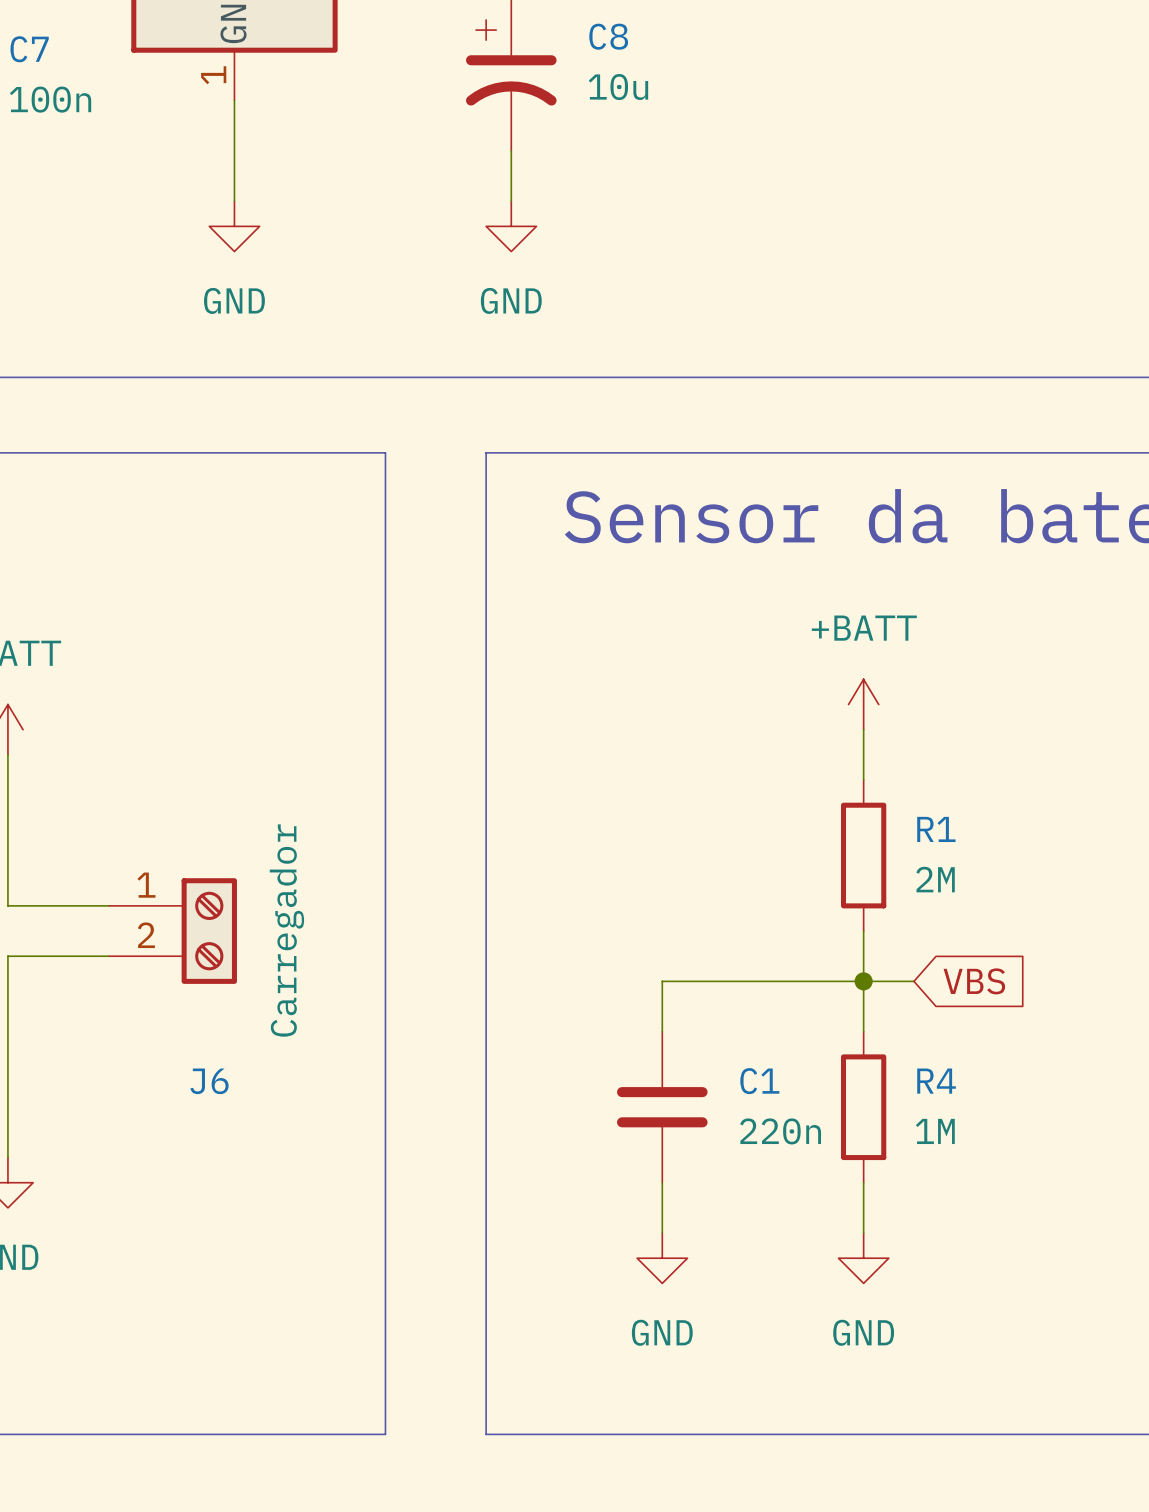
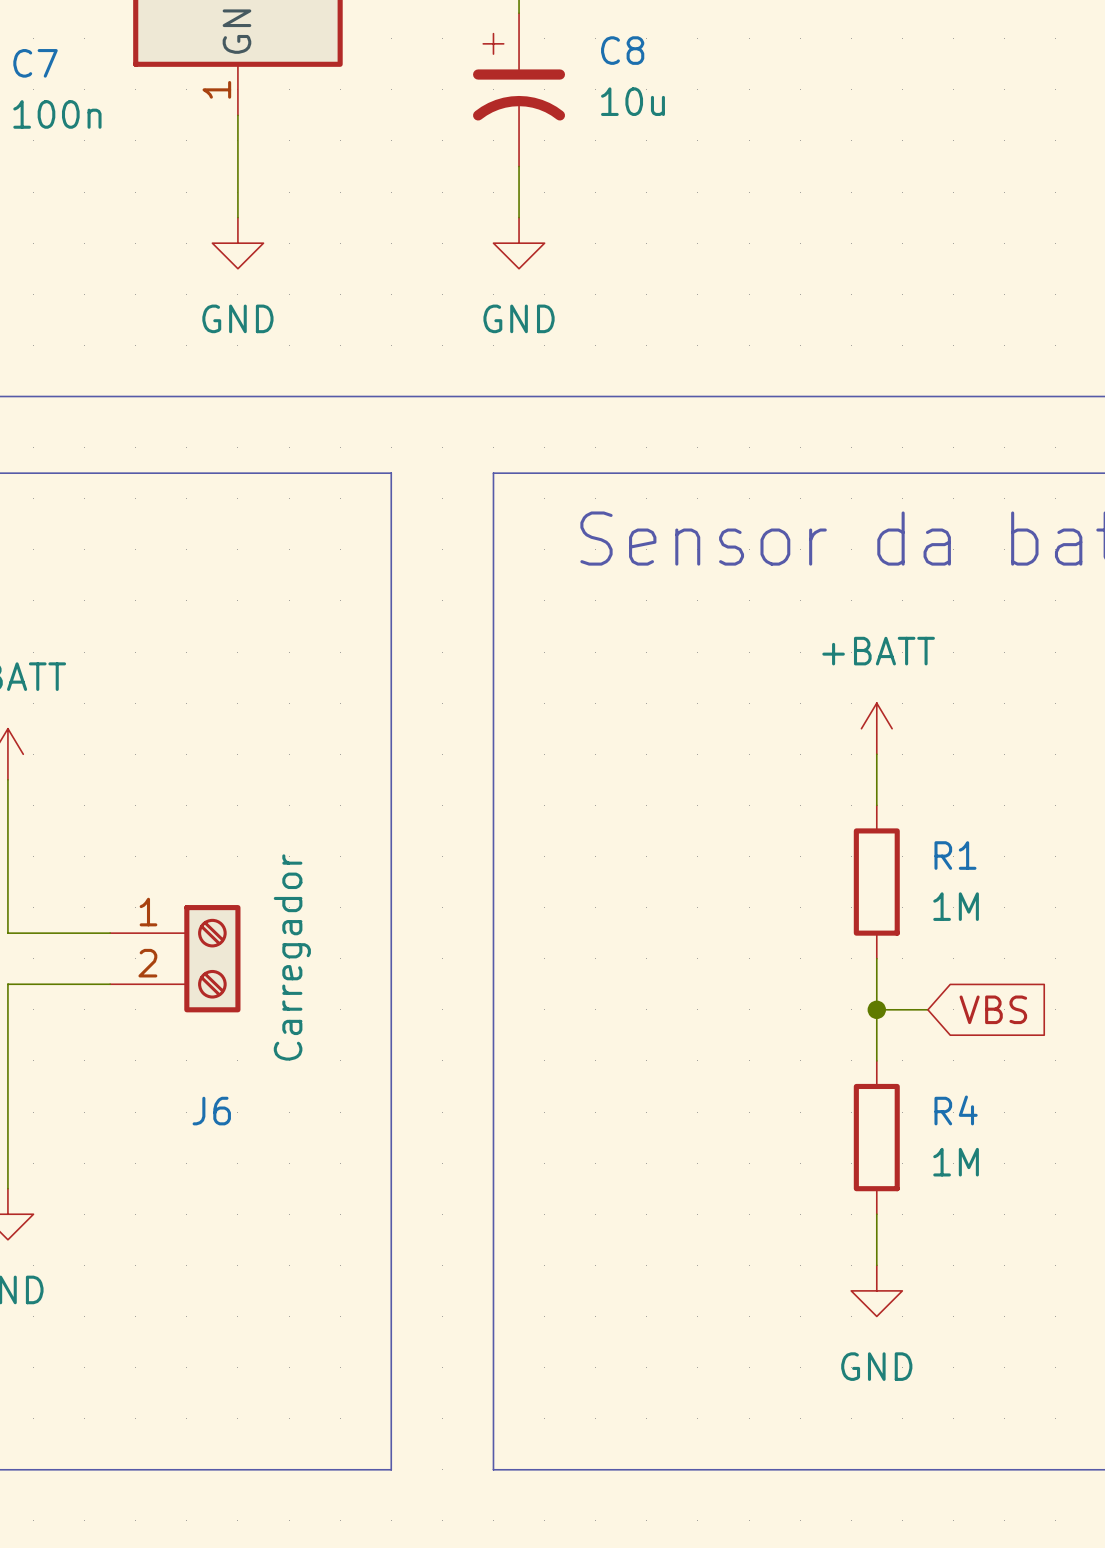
R1 value: 2M (935, 879) -> 1M (956, 906)
wire: (863, 981) (662, 981) (662, 1031) -> none
C1: 220n (662, 1107) -> none
wire: (662, 1182) (662, 1233) -> none
power symbol: GND (662, 1258) -> none

